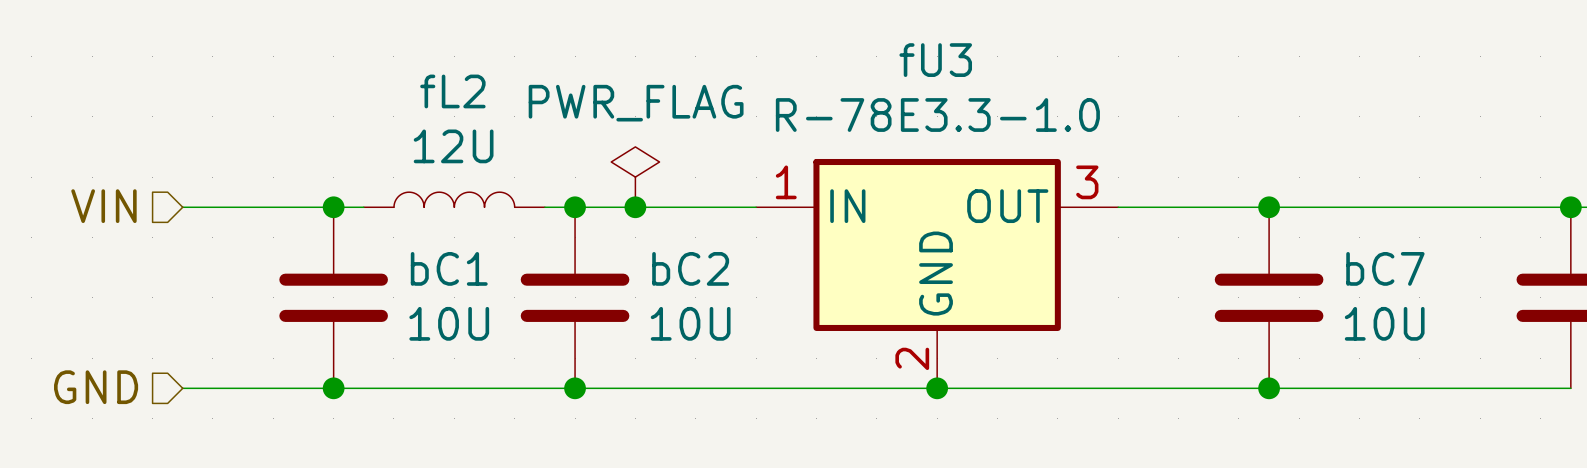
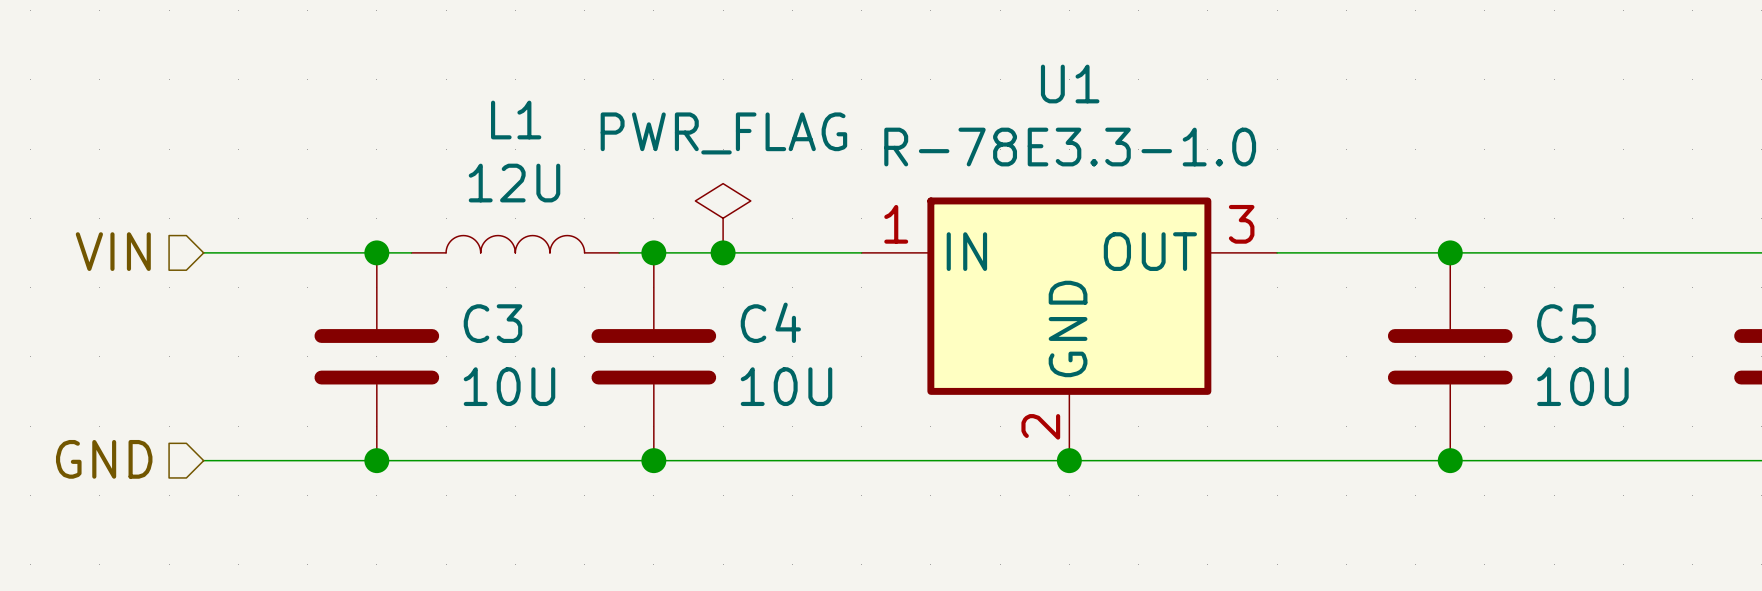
fU3 name: fU3 (935, 60) -> U1 (1070, 84)
fL2 name: fL2 (452, 91) -> L1 (516, 120)
bC1 name: bC1 (449, 268) -> C3 (493, 323)
bC2 name: bC2 (690, 268) -> C4 (770, 322)
bC7 name: bC7 (1385, 268) -> C5 (1566, 323)

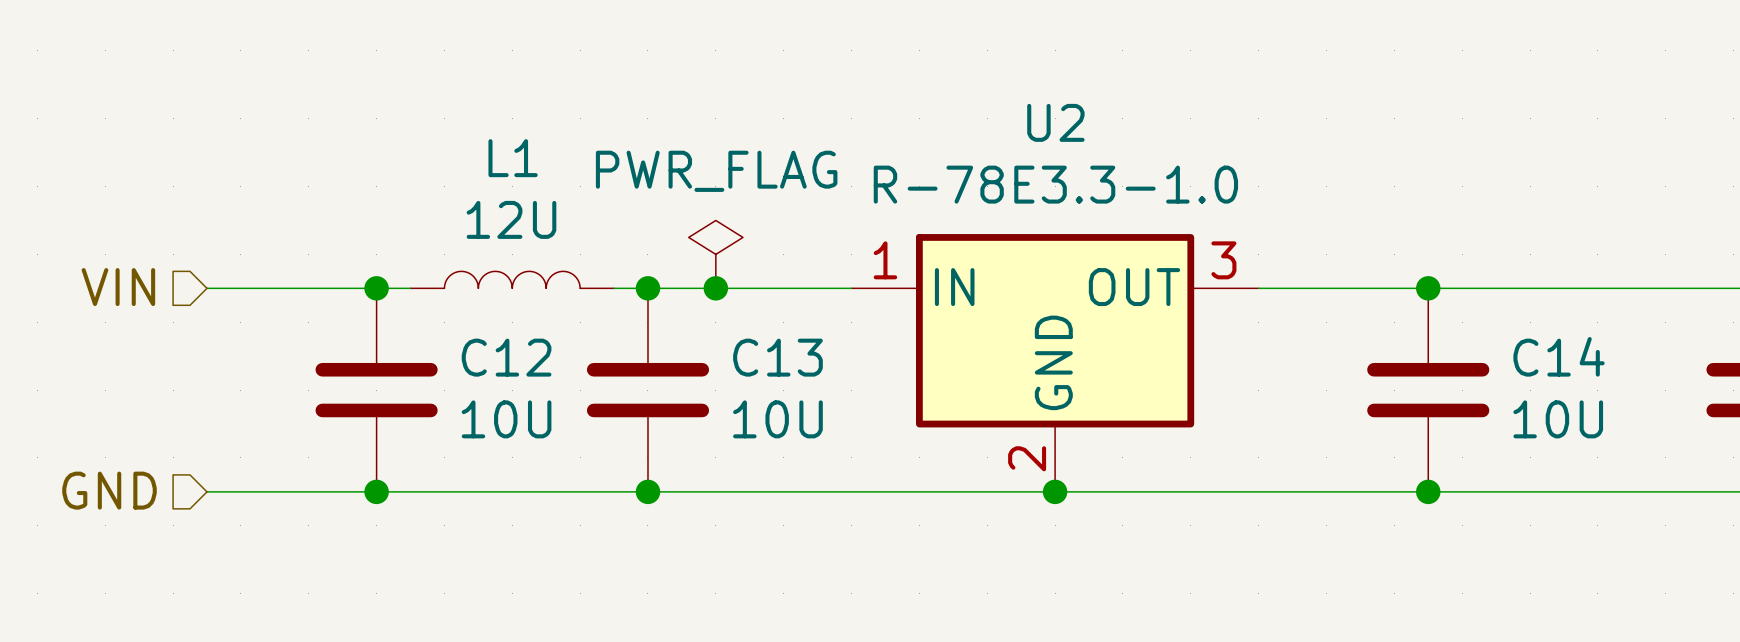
U1 name: U1 (1070, 84) -> U2 (1055, 122)
C4 name: C4 (770, 322) -> C13 (777, 357)
C3 name: C3 (493, 323) -> C12 (506, 357)
C5 name: C5 (1566, 323) -> C14 (1559, 356)

